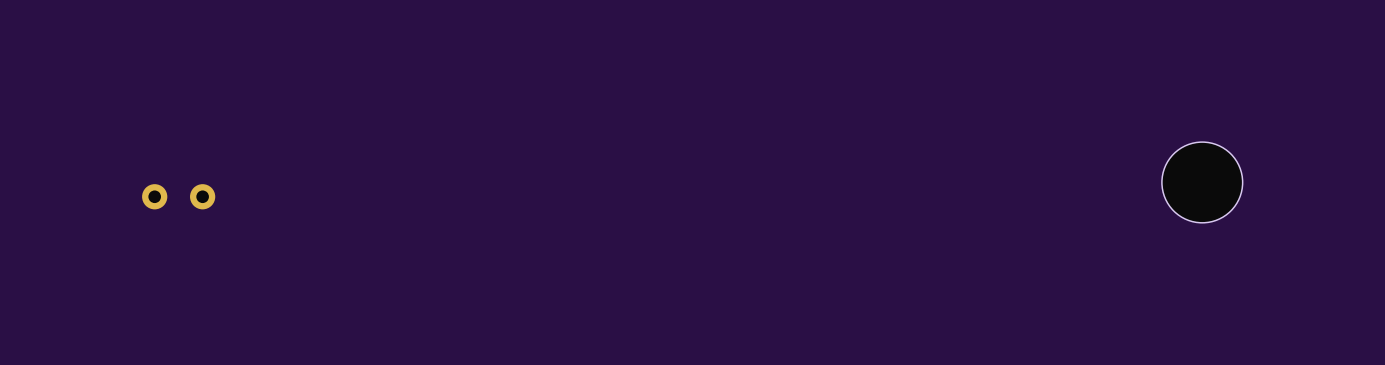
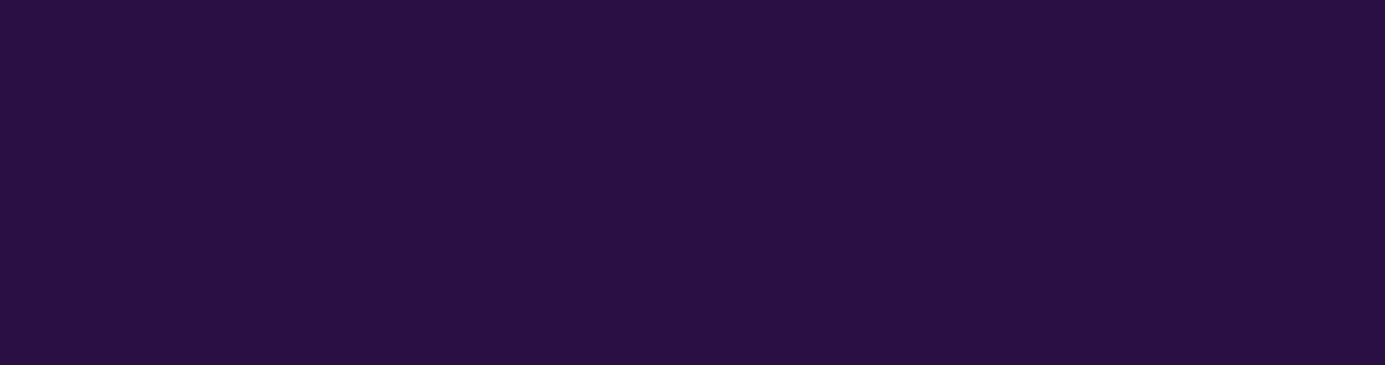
part: (1202, 182) -> none
part: (178, 196) -> none

